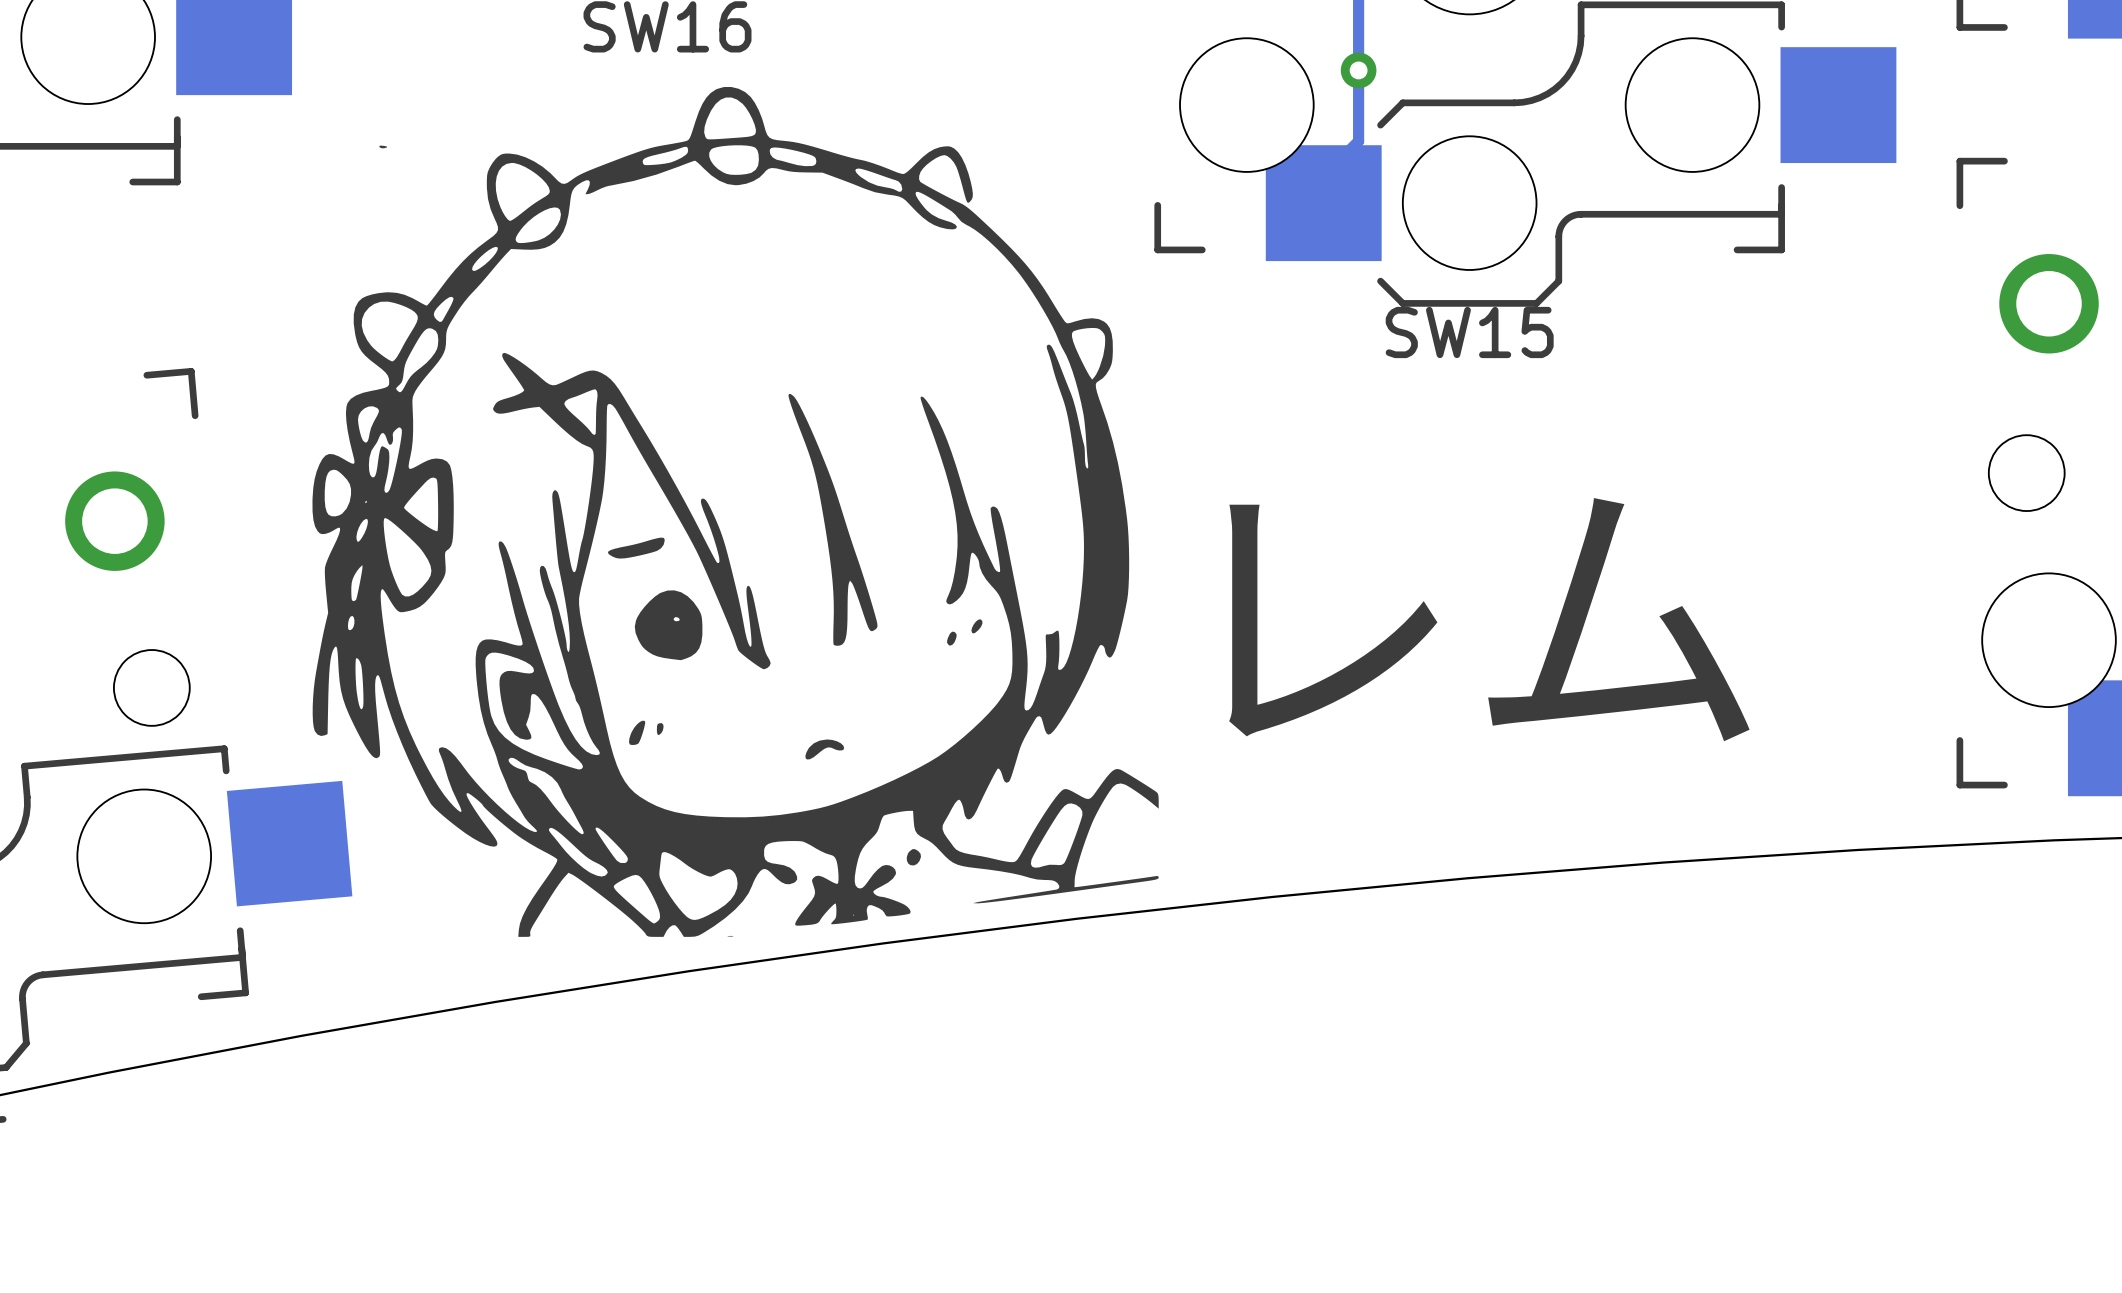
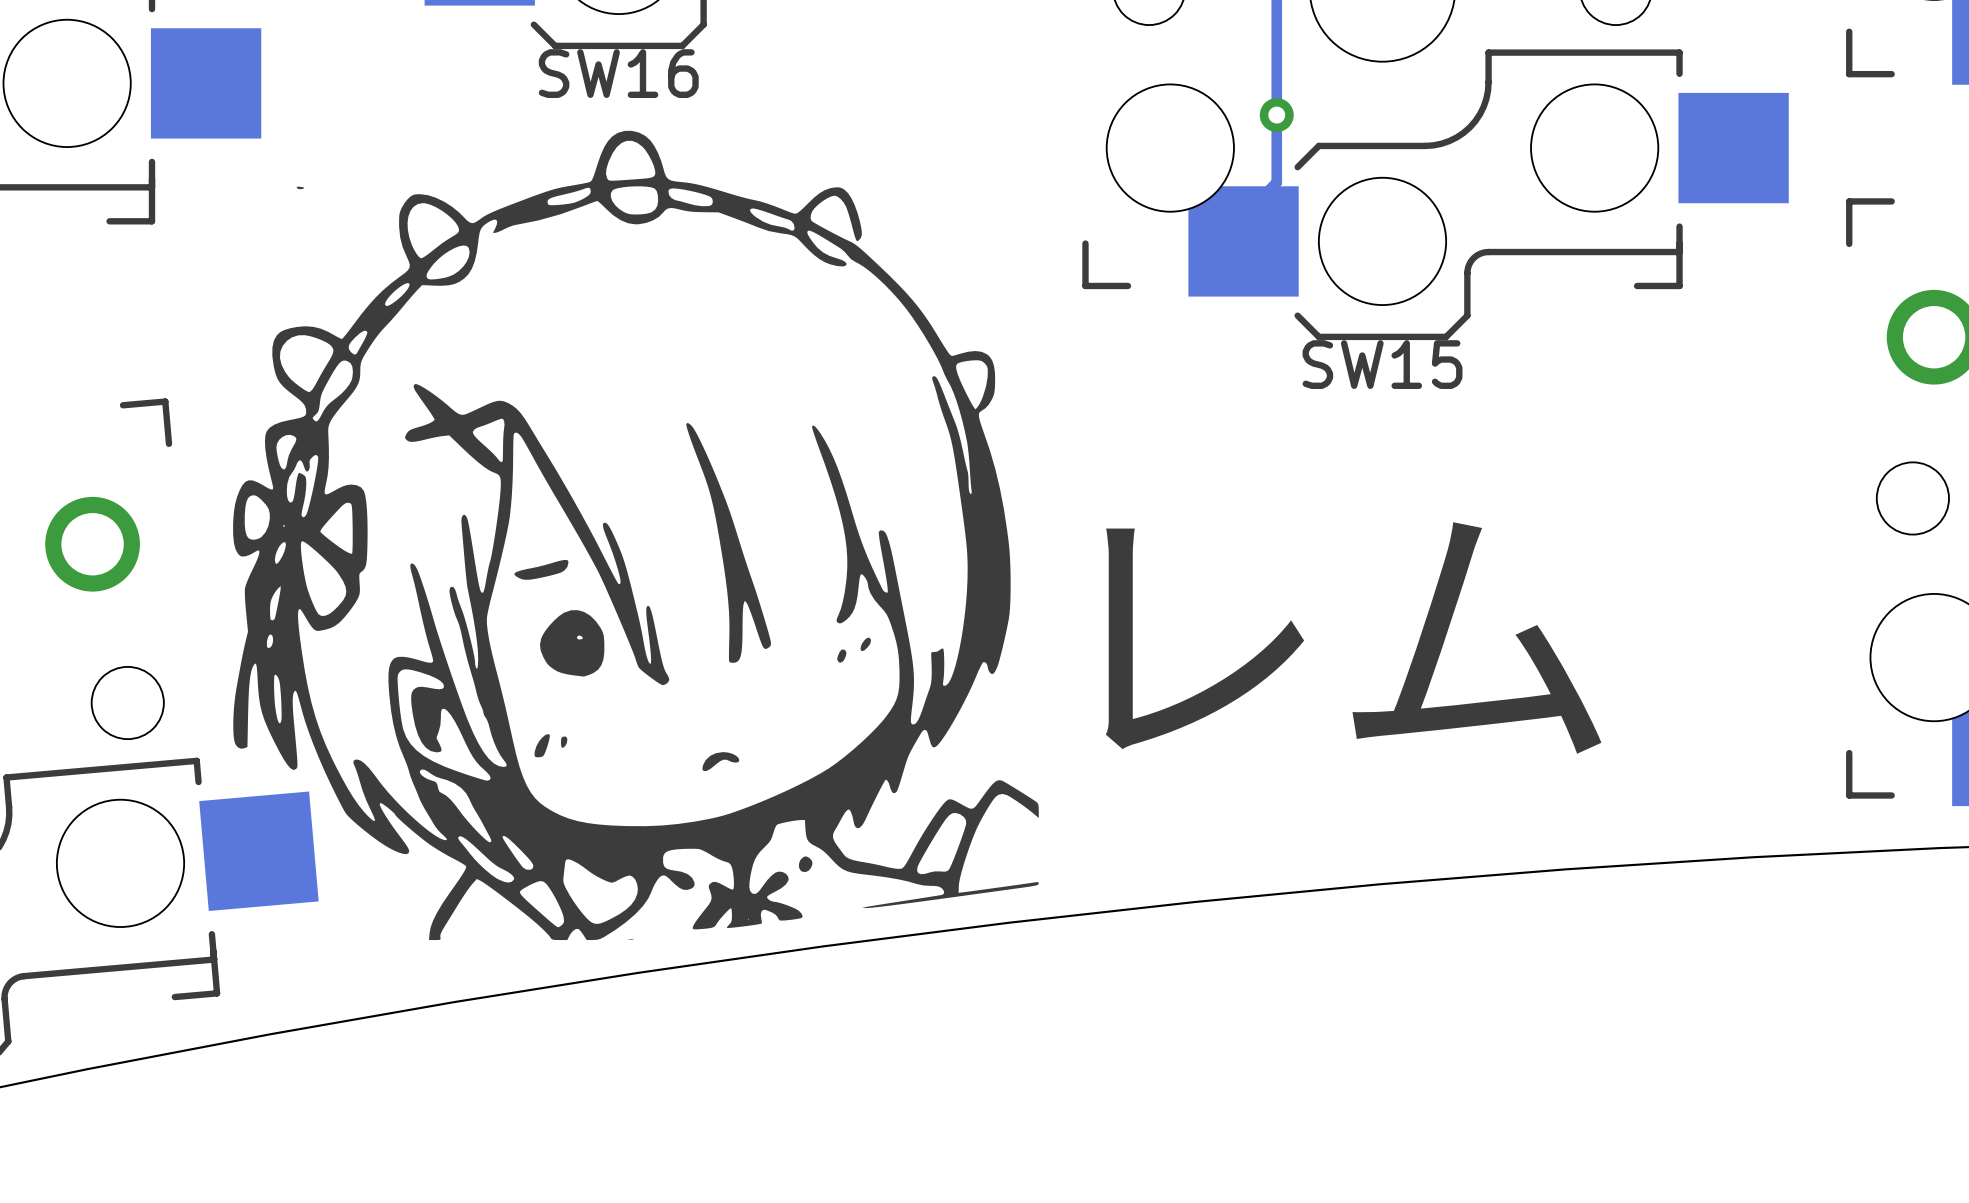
drawing position: (735, 511) -> (635, 535)
text position: レム (1489, 619) -> レム (1353, 638)

